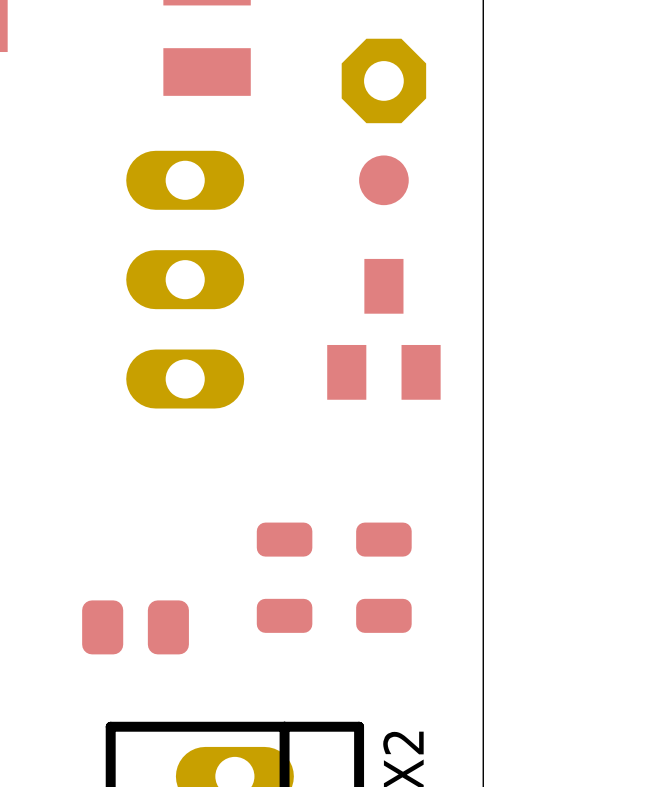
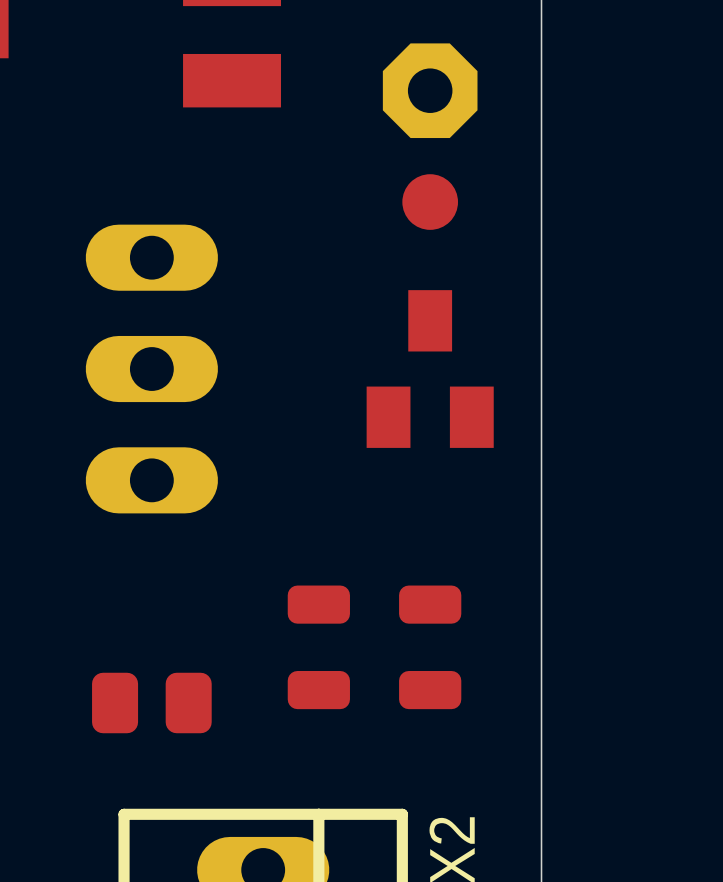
part position: (185, 279) -> (151, 369)

